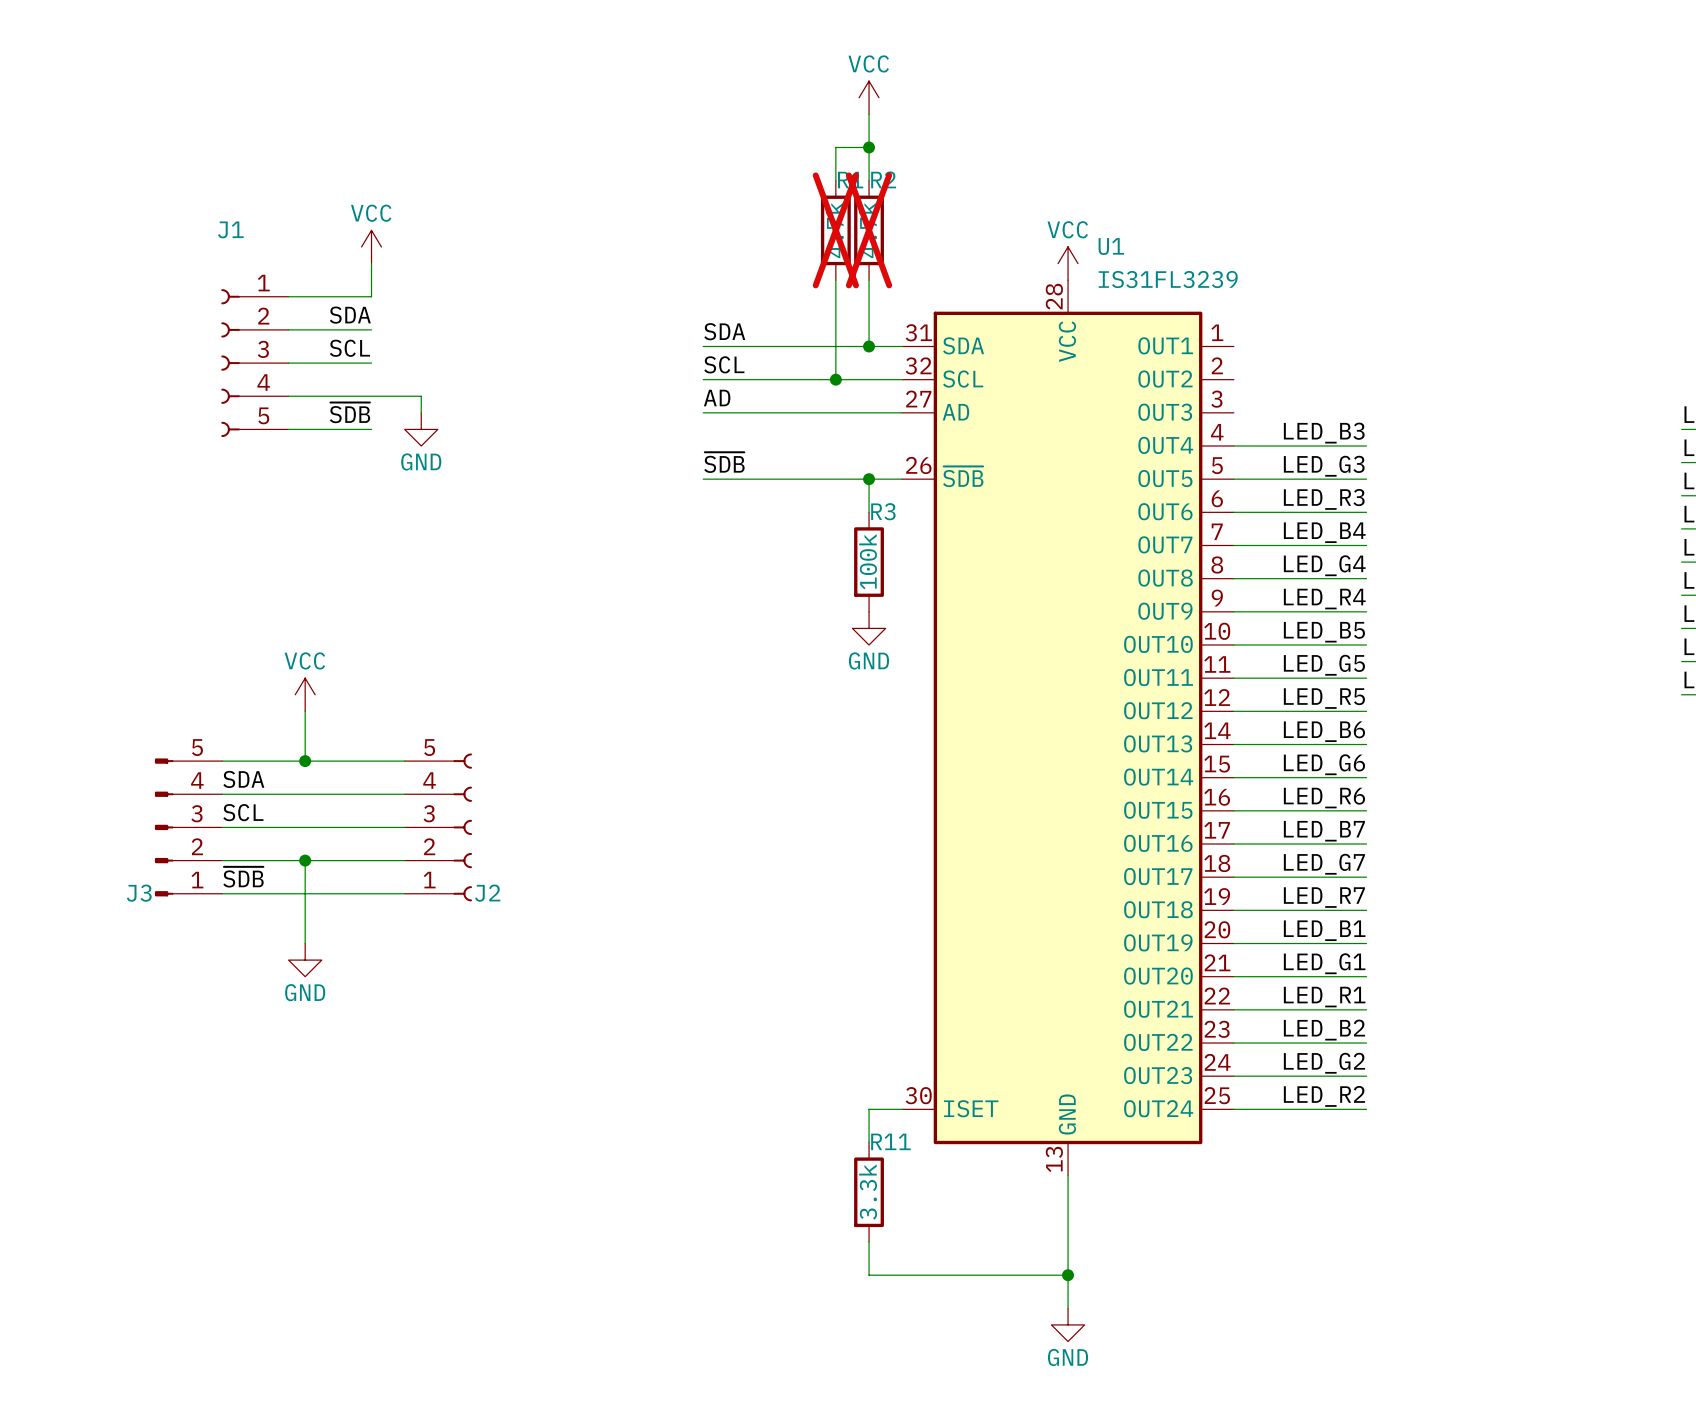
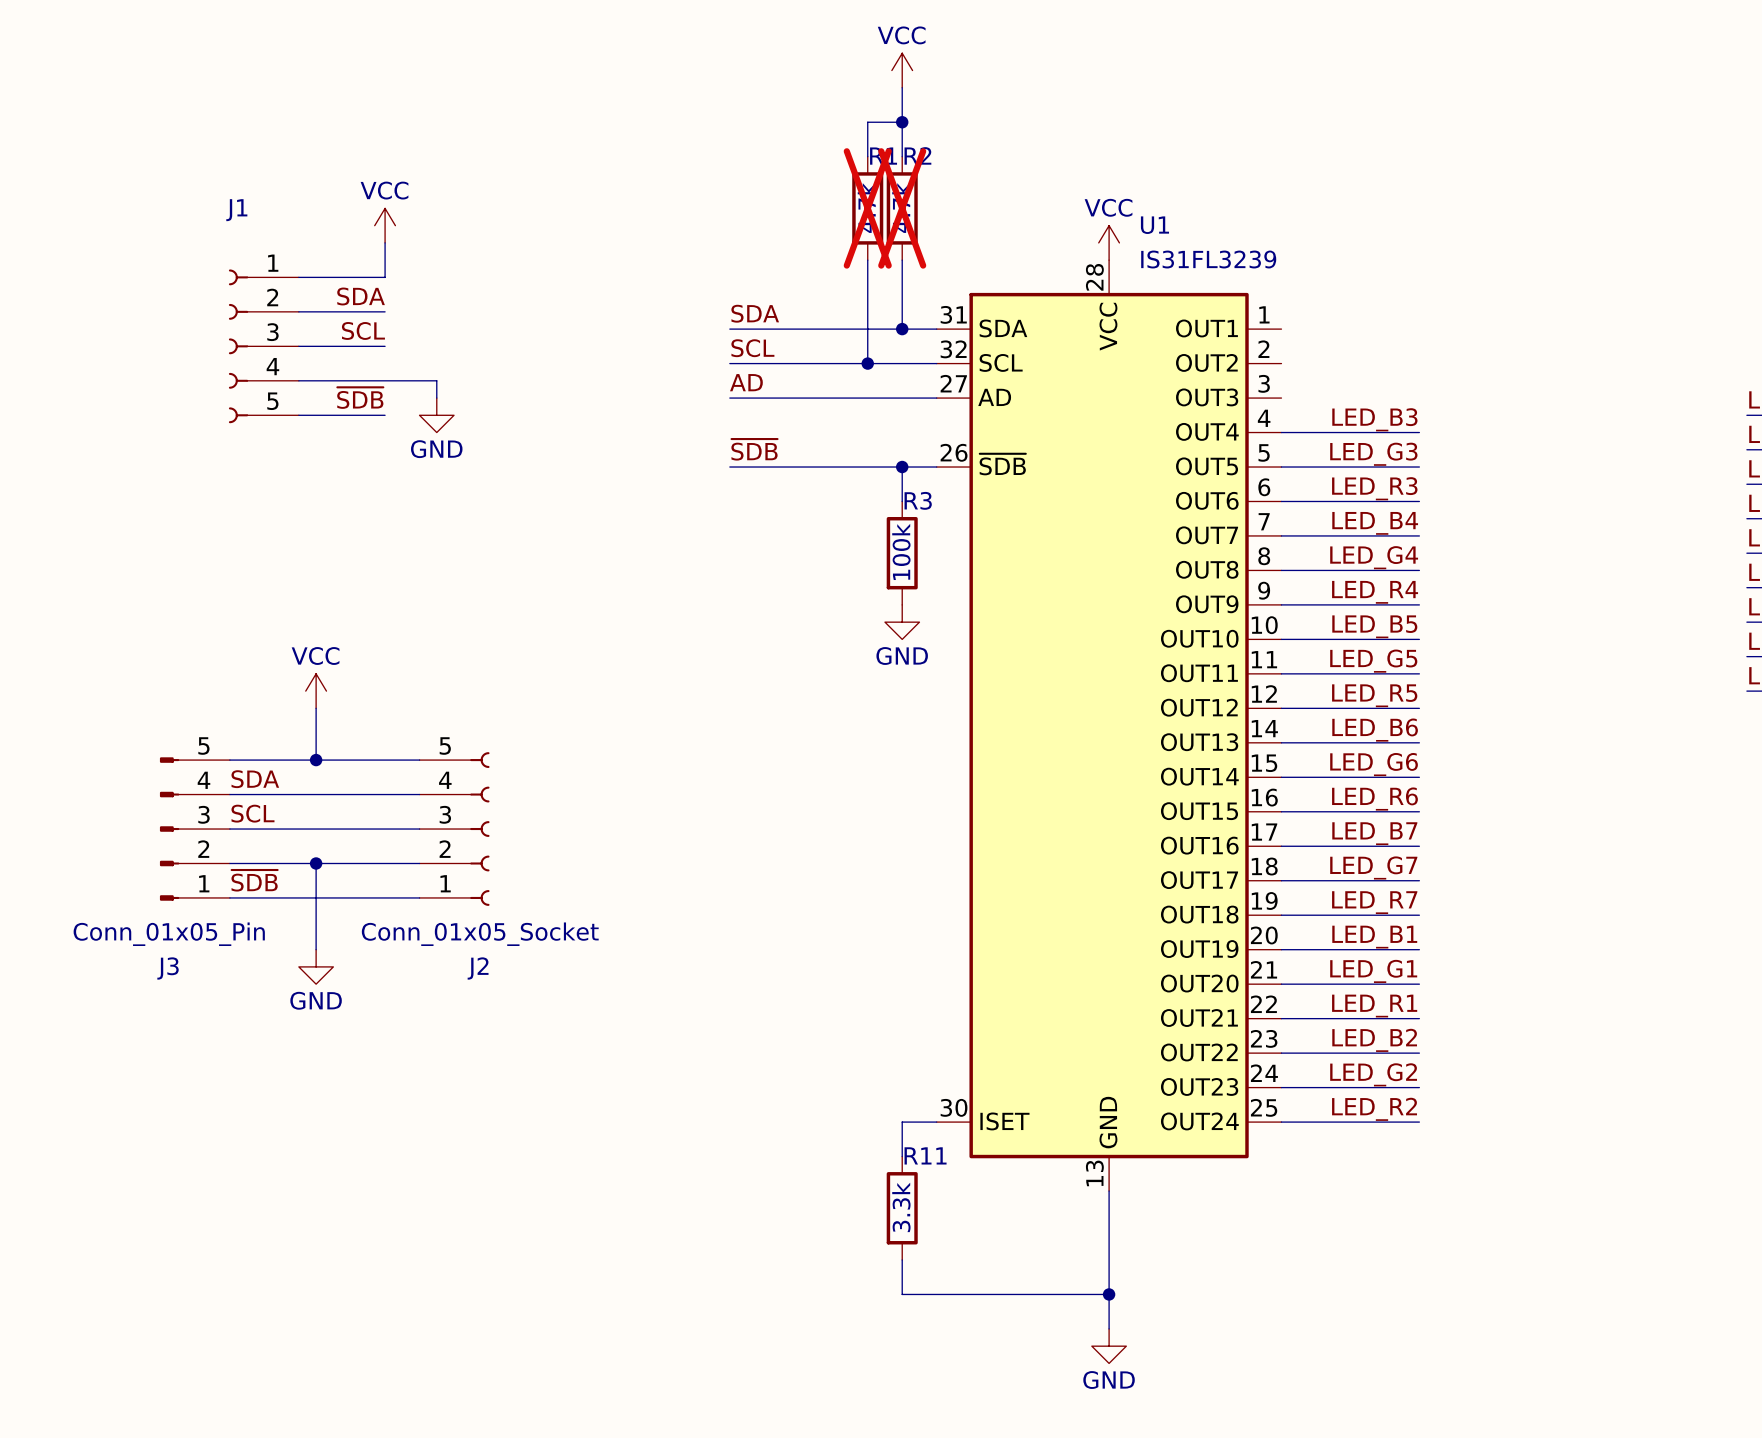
J3 name position: J3 (139, 893) -> J3 (168, 968)
J2 name position: J2 (487, 893) -> J2 (478, 968)
J3 value: none -> Conn_01x05_Pin (169, 934)
J2 value: none -> Conn_01x05_Socket (480, 934)

